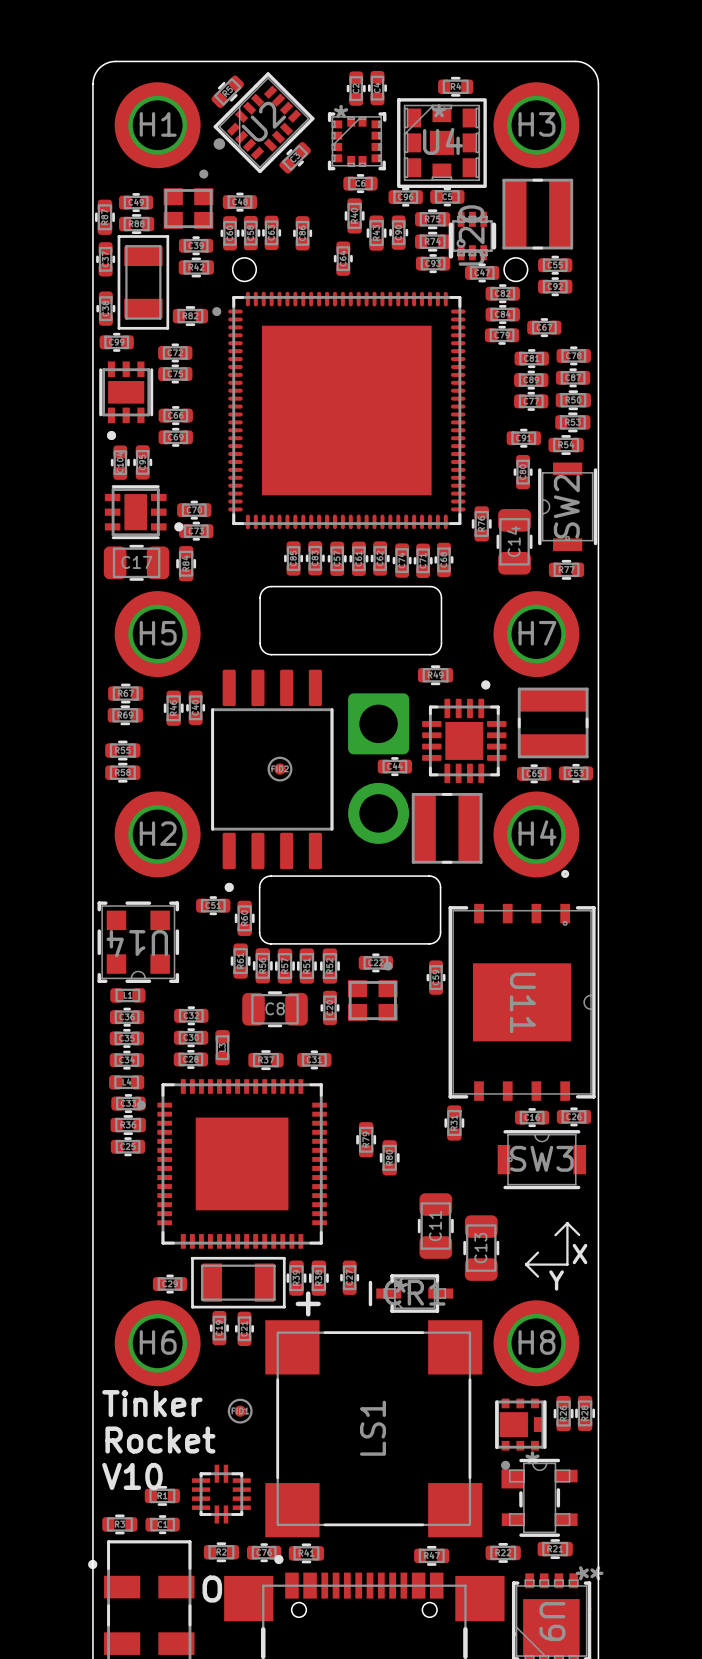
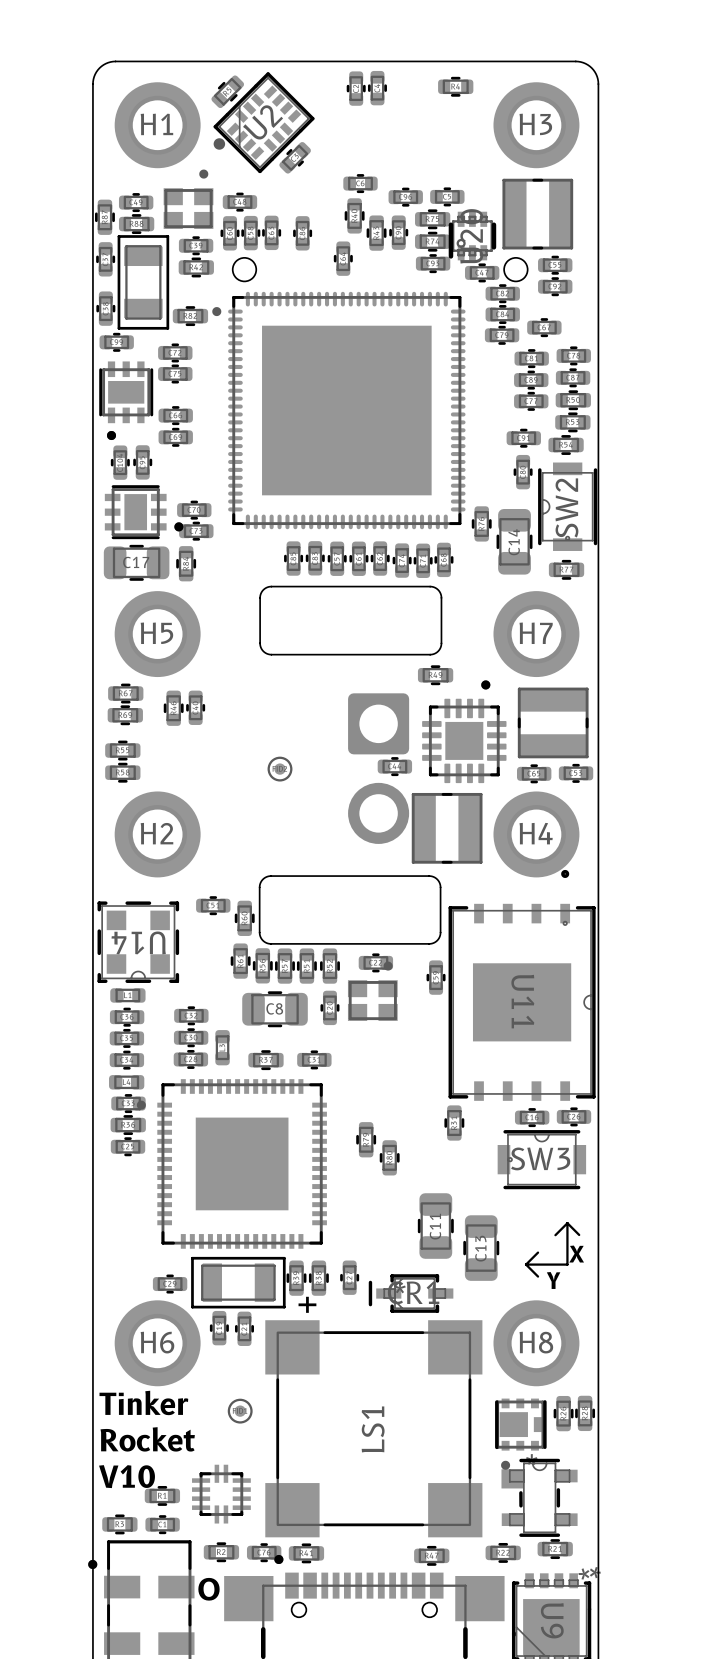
part: (357, 141) -> none
U4: (441, 143) -> none
part: (272, 780) -> none

